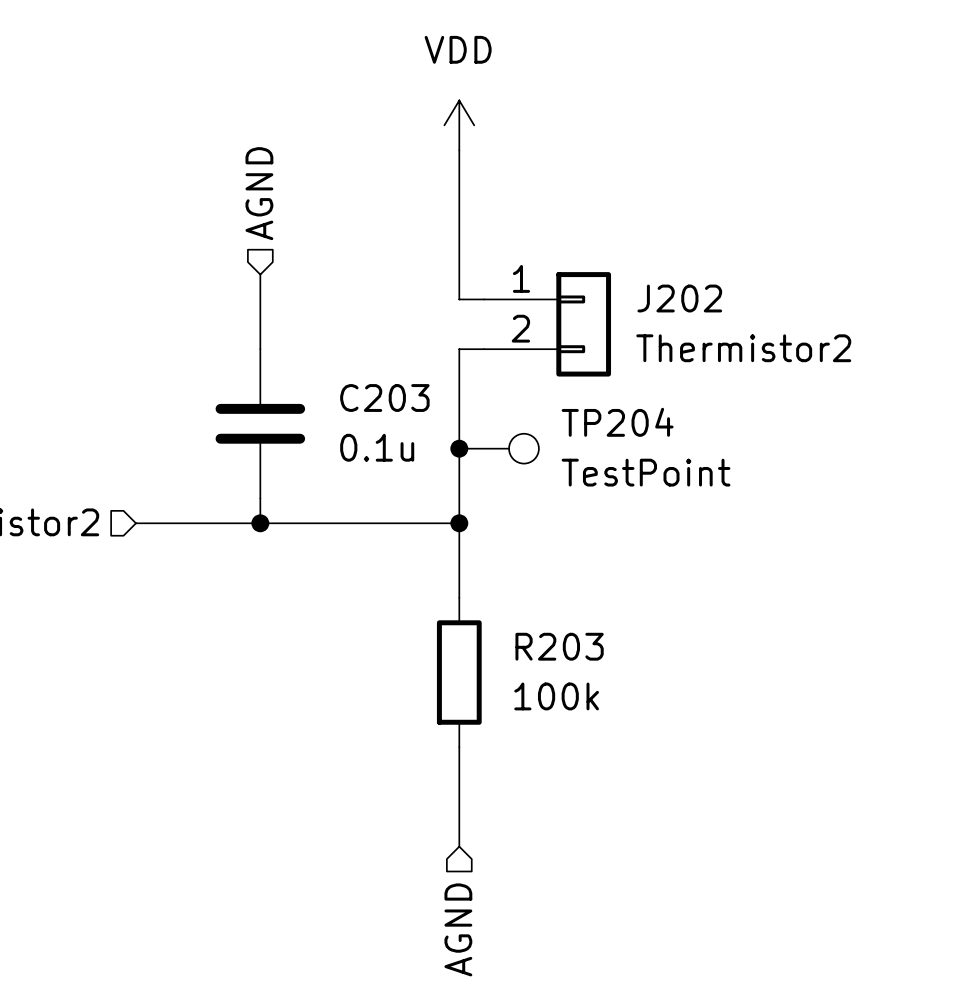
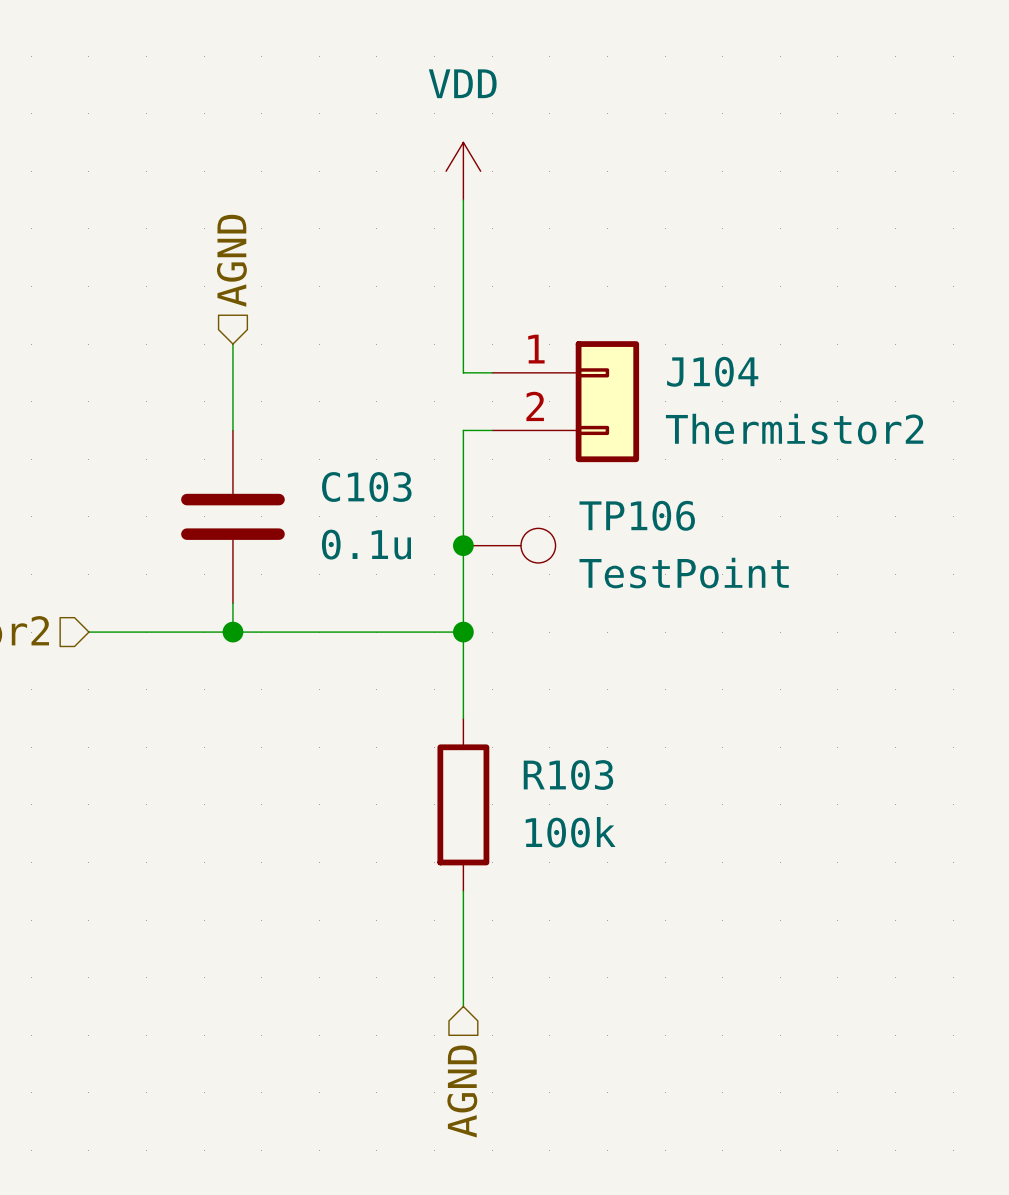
J202 name: J202 (679, 298) -> J104 (712, 371)
C203 name: C203 (384, 398) -> C103 (366, 487)
TP204 name: TP204 (617, 422) -> TP106 (637, 515)
R203 name: R203 (559, 646) -> R103 (568, 775)

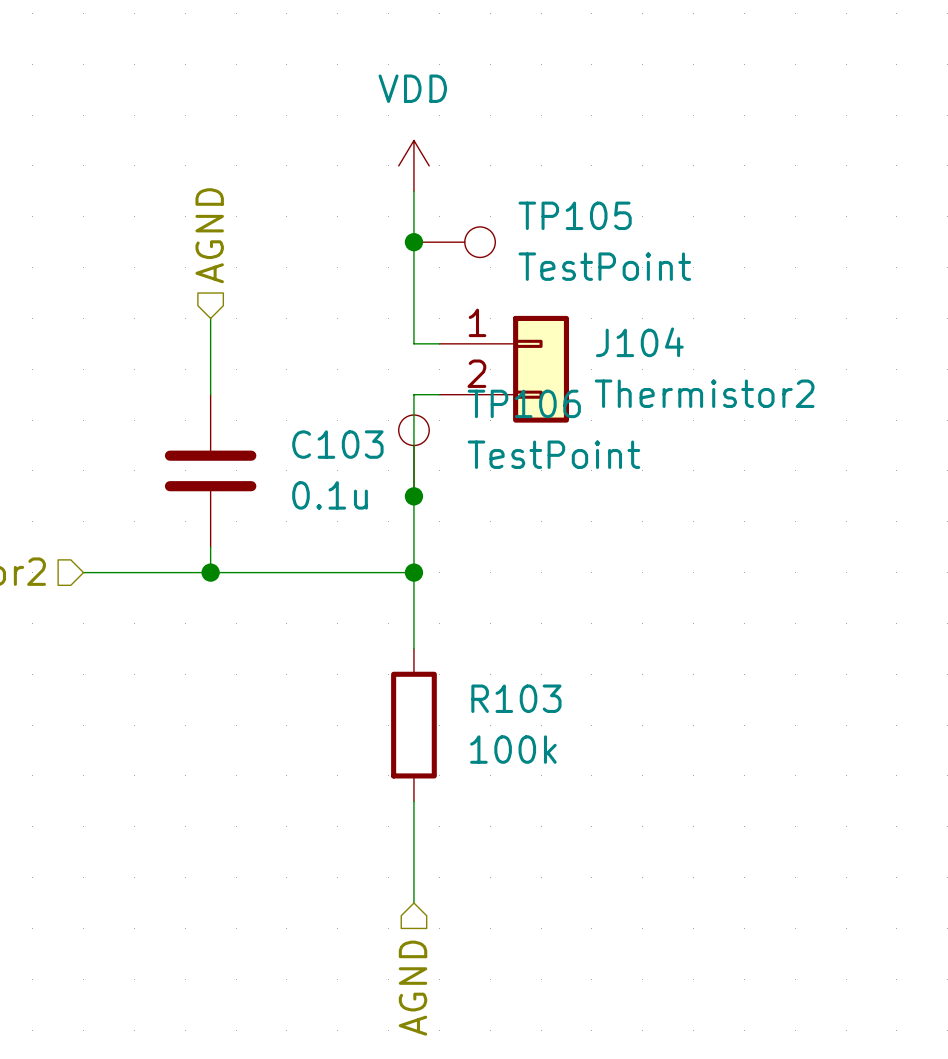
junction: none -> (413, 242)
TP105: none -> TestPoint (454, 242)
TP106 position: (509, 545) -> (413, 455)
TP106 rotation: 0° (538, 545) -> 90° counterclockwise (413, 430)

